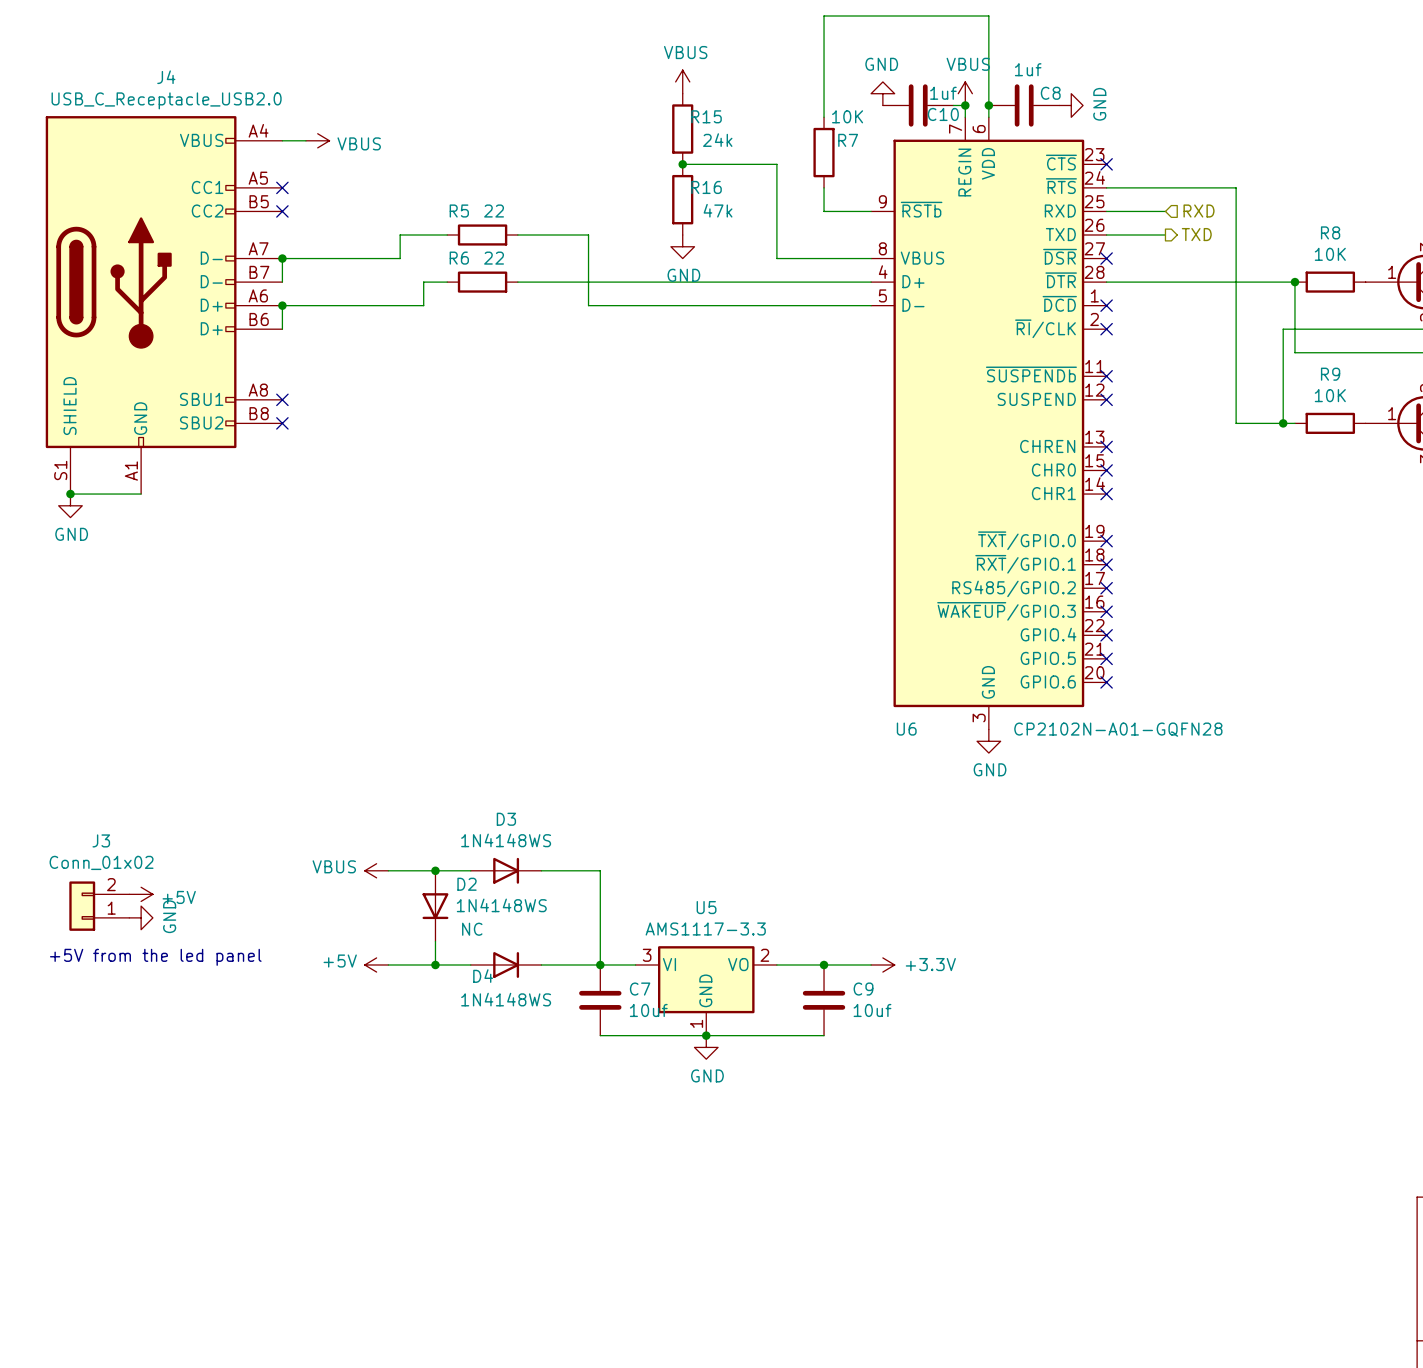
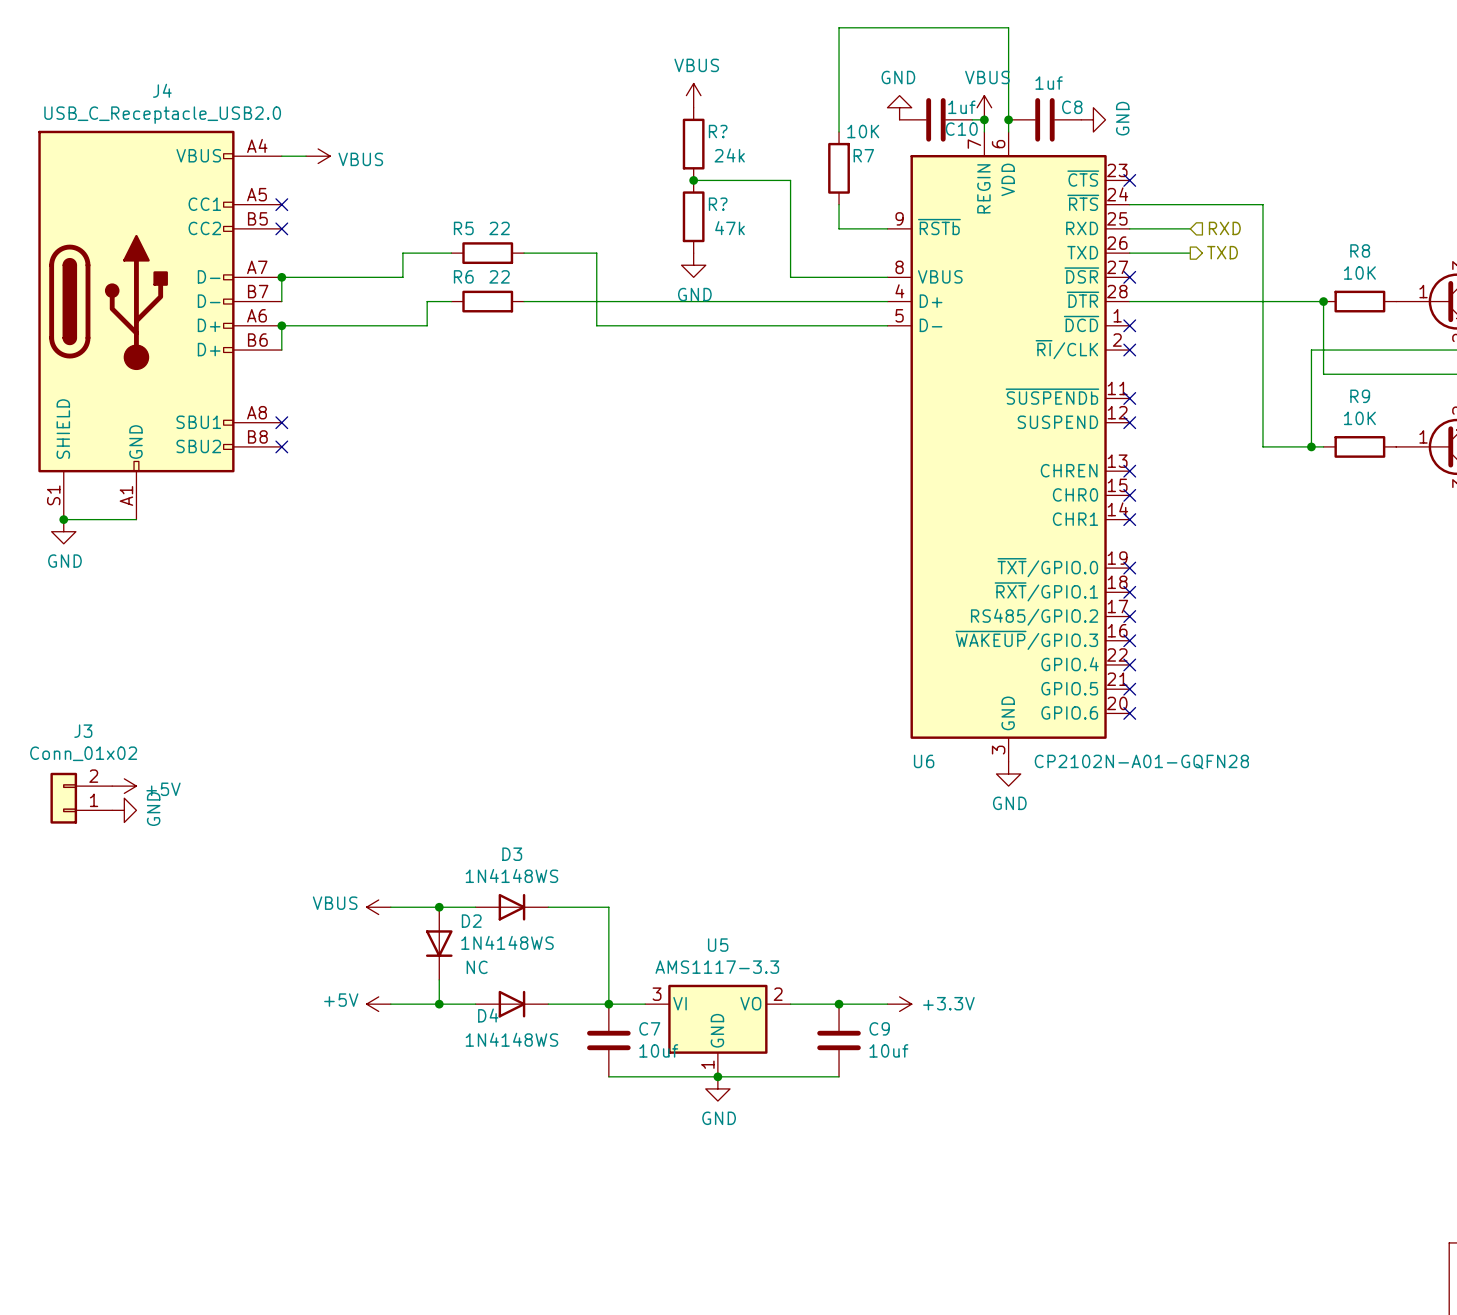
R15 name: R15 (706, 116) -> R? (718, 131)
R16 name: R16 (706, 187) -> R? (718, 204)
power symbol position: +5V (141, 894) -> +5V (124, 786)
J3 position: (99, 906) -> (81, 798)
power symbol position: GND (141, 917) -> GND (124, 810)
text: +5V from the led panel (155, 957) -> none

